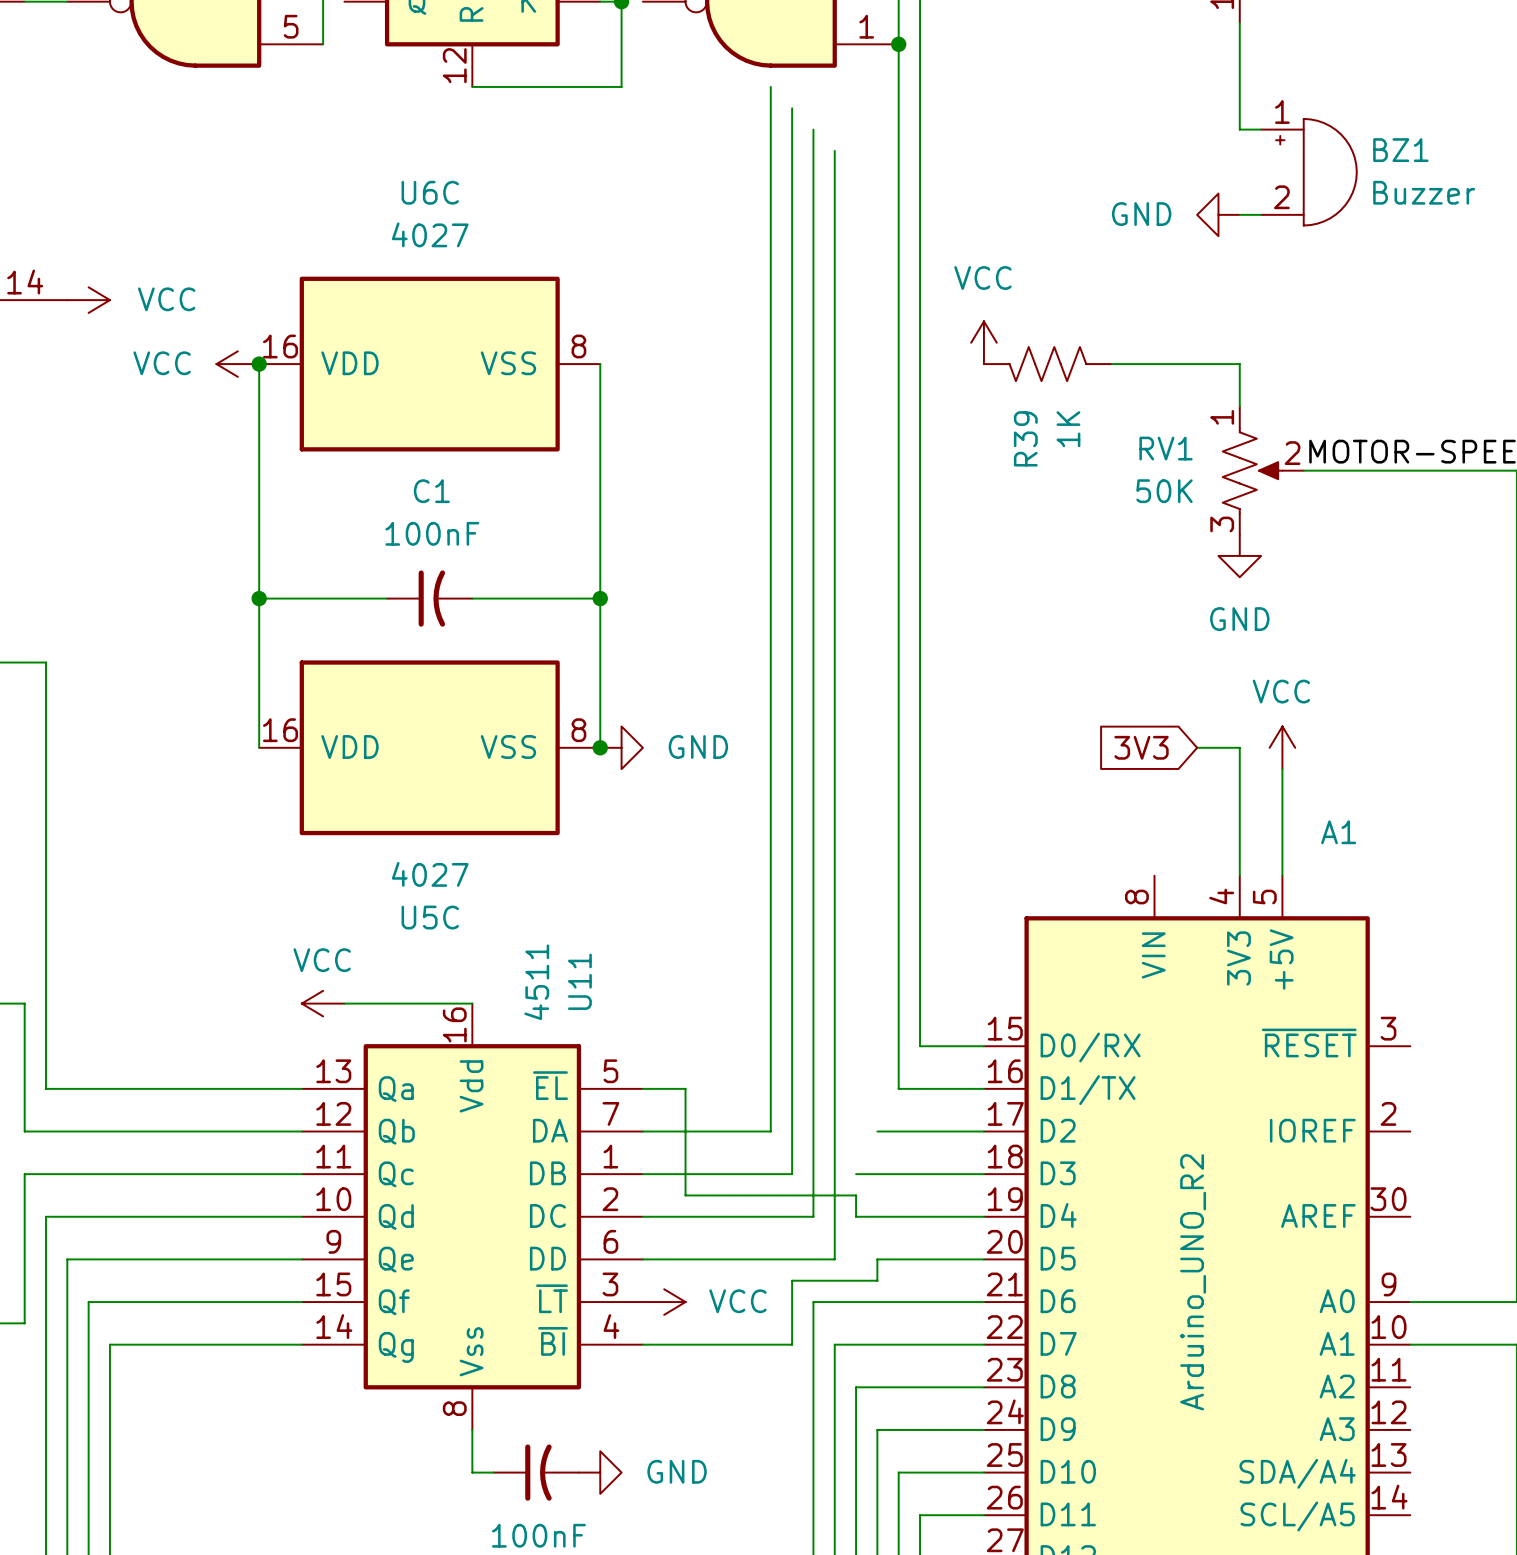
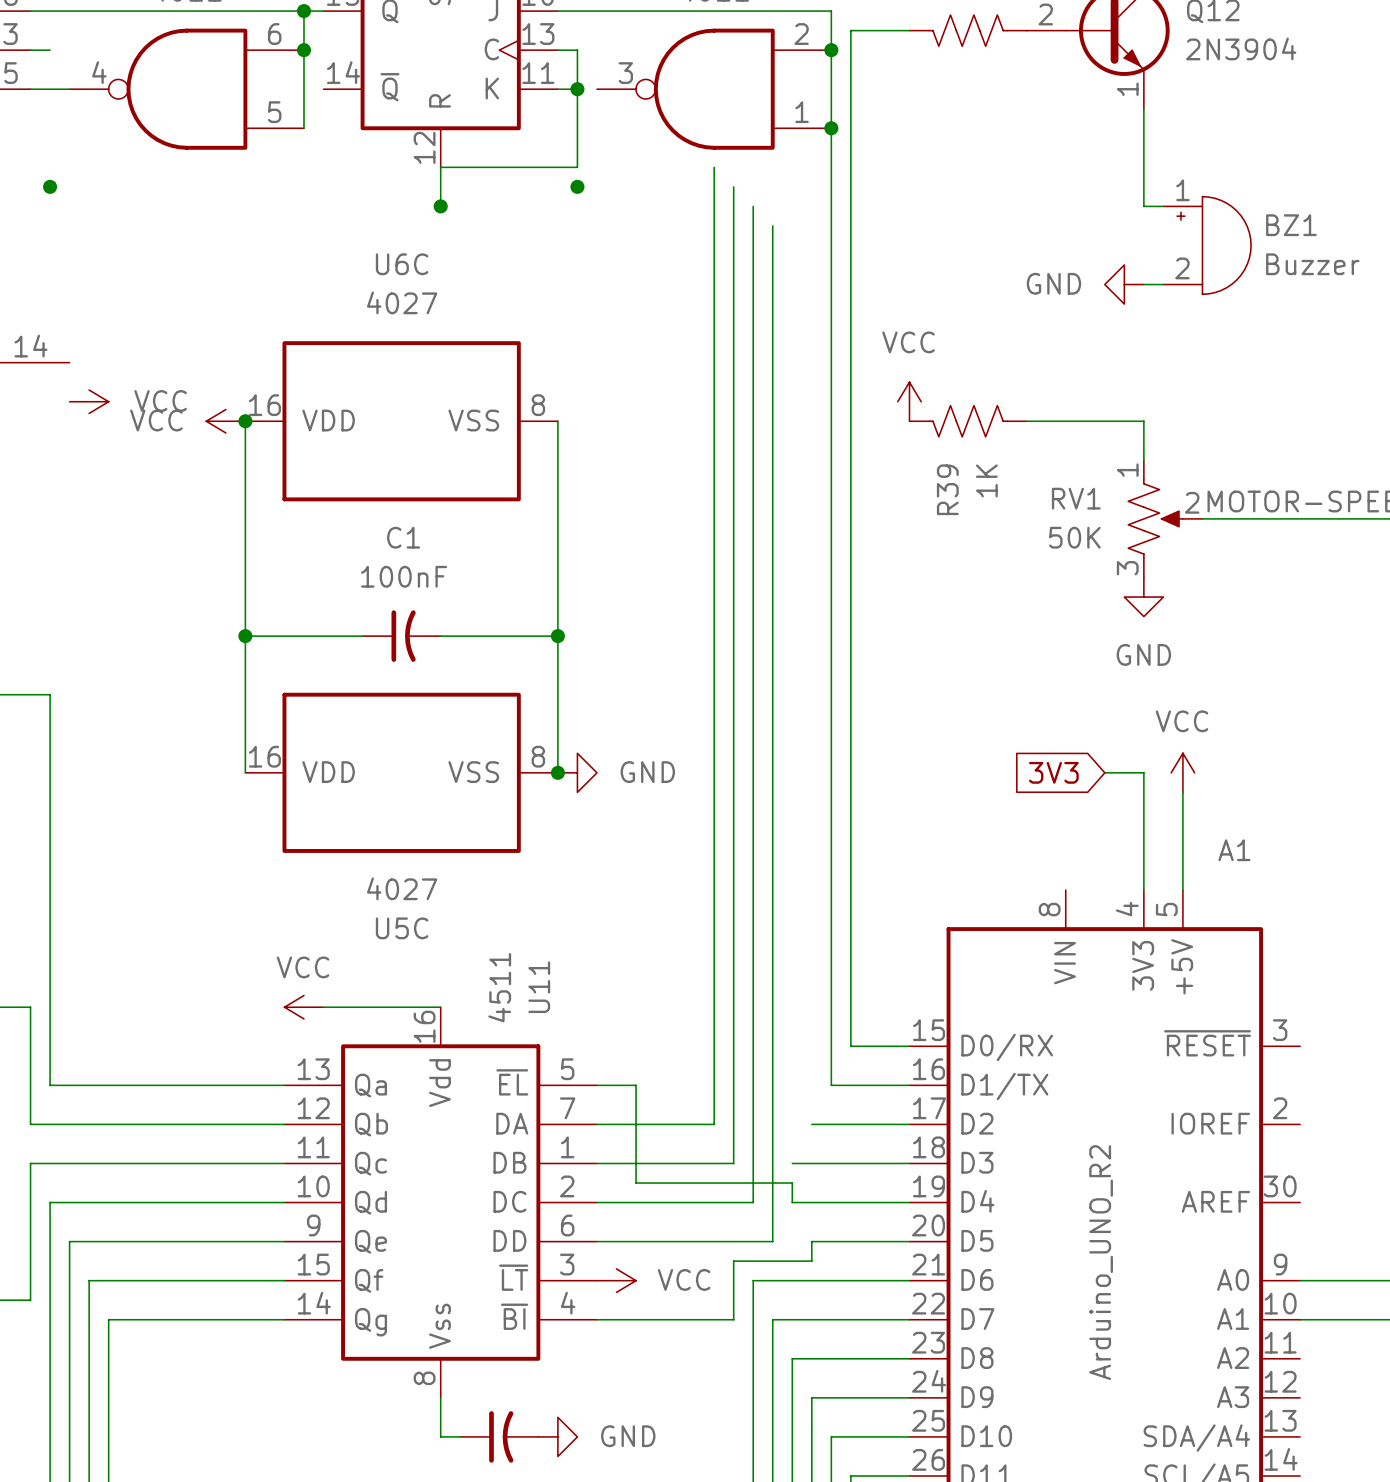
wire: none -> (440, 167) (440, 206)
junction: none -> (50, 186)
junction: none -> (577, 186)
junction: none -> (440, 206)
power symbol position: VCC (88, 300) -> VCC (89, 401)

